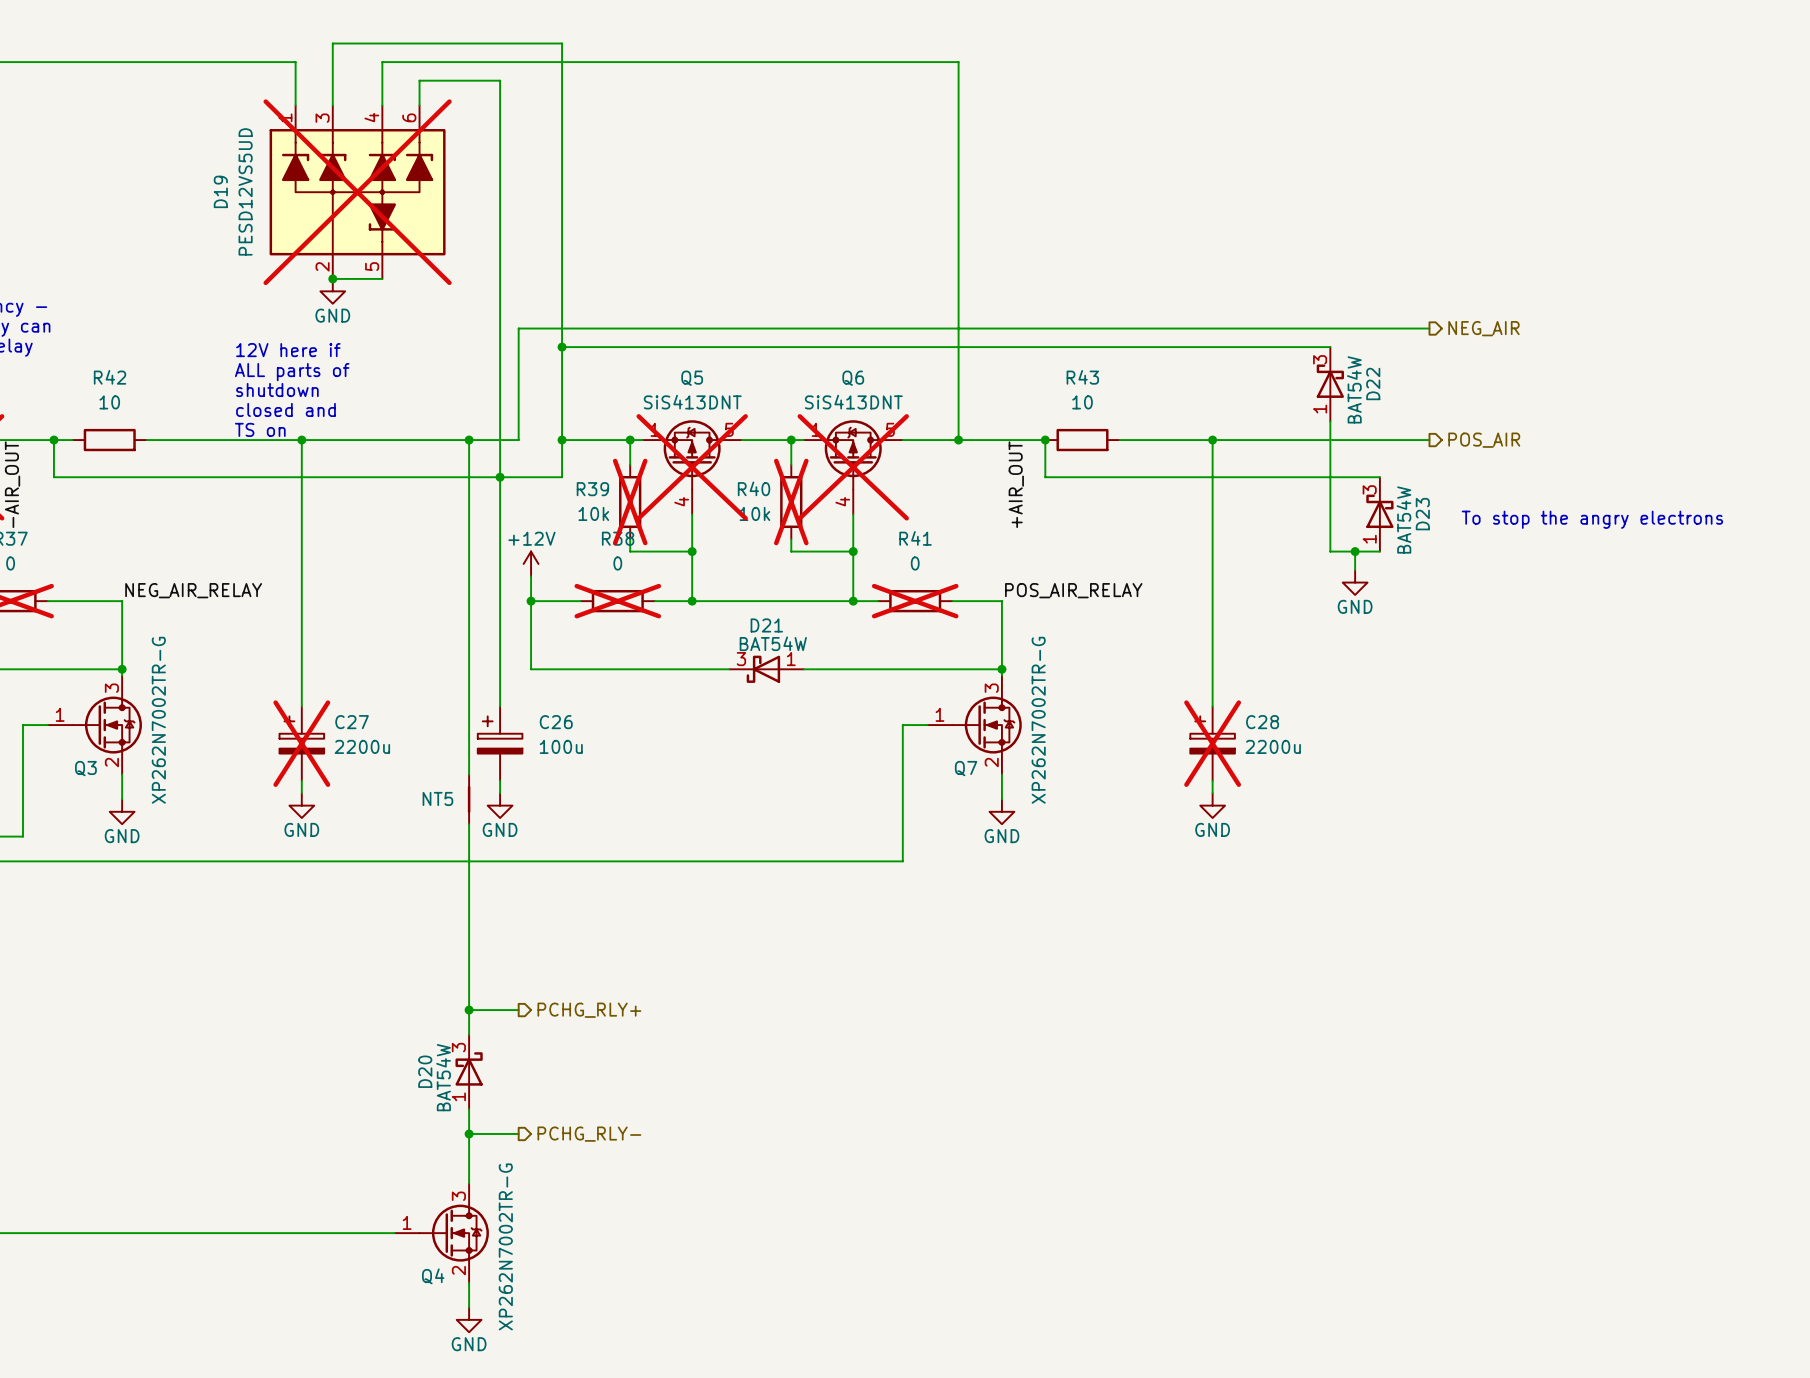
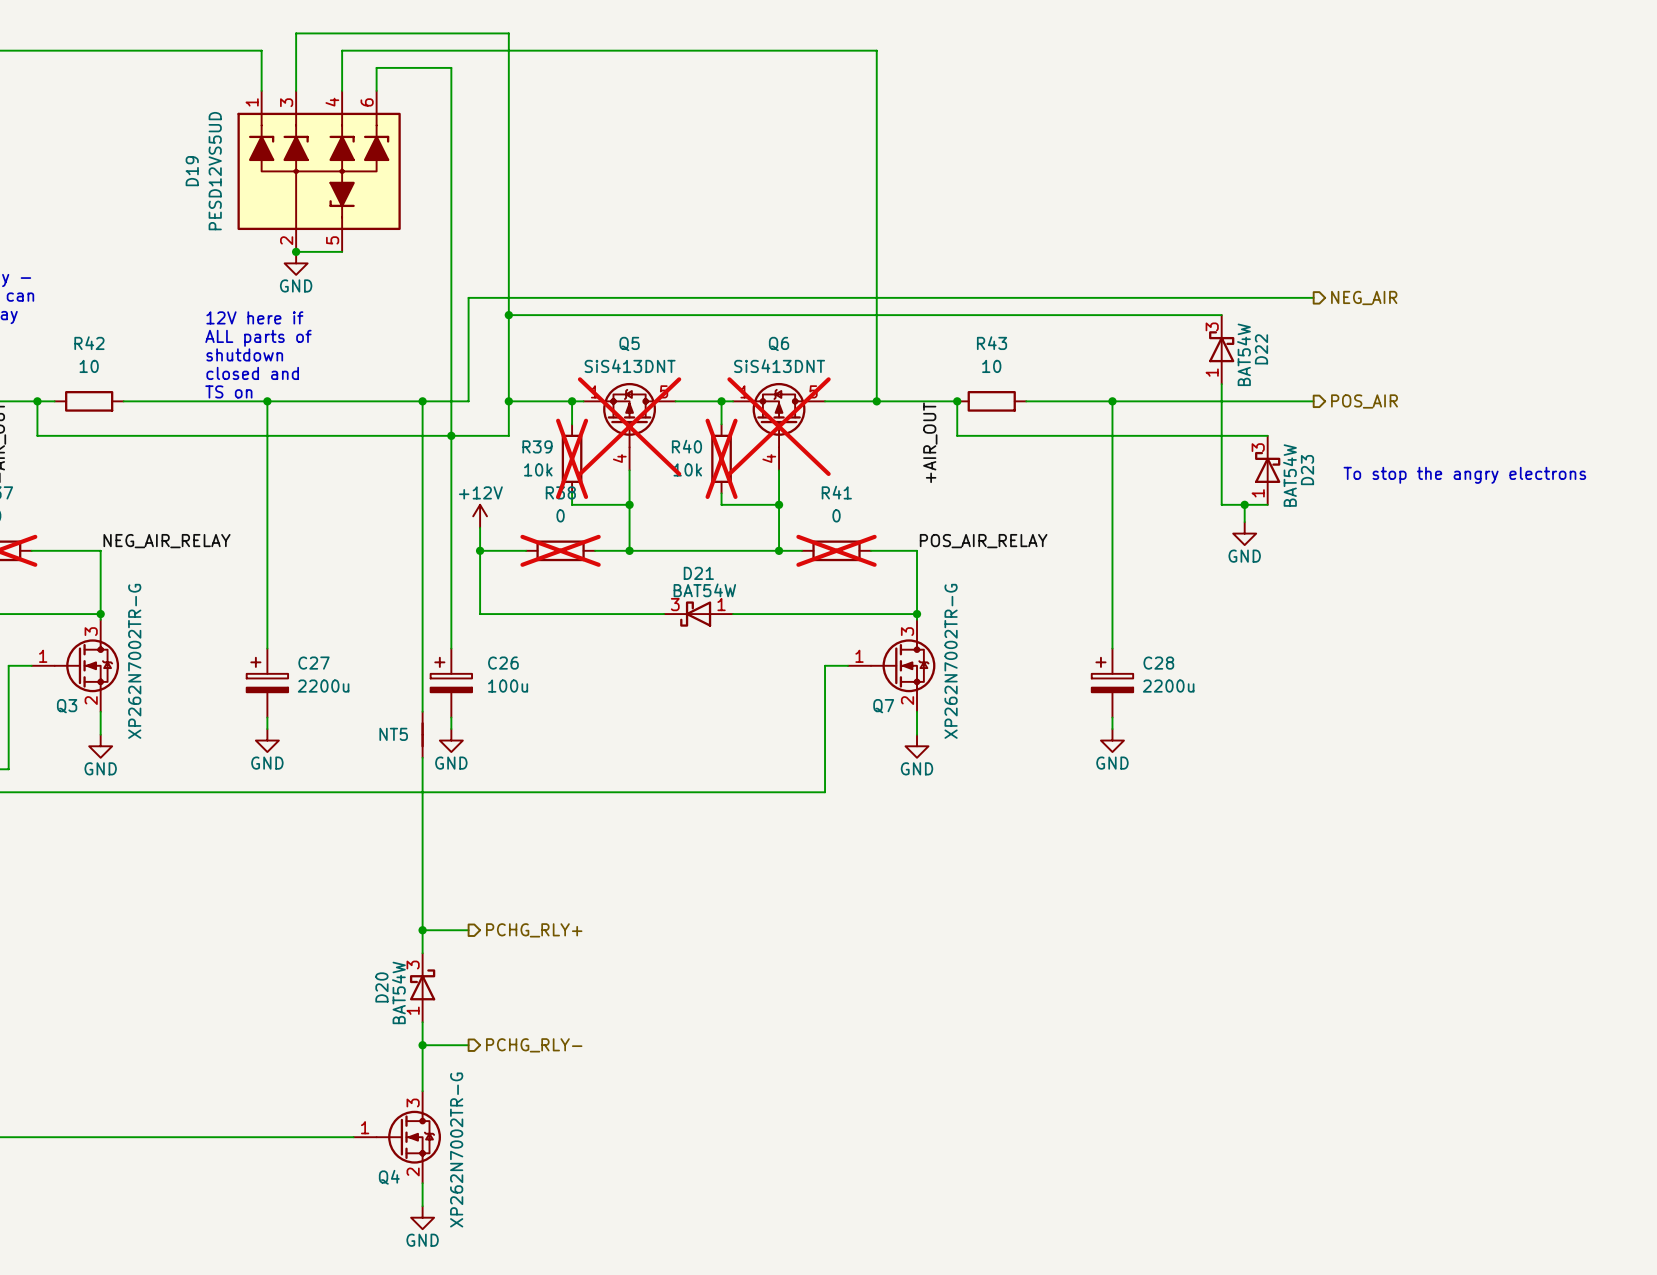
D19 do-not-place cross: (357, 192) -> none
C27 do-not-place cross: (301, 743) -> none
C28 do-not-place cross: (1212, 743) -> none

